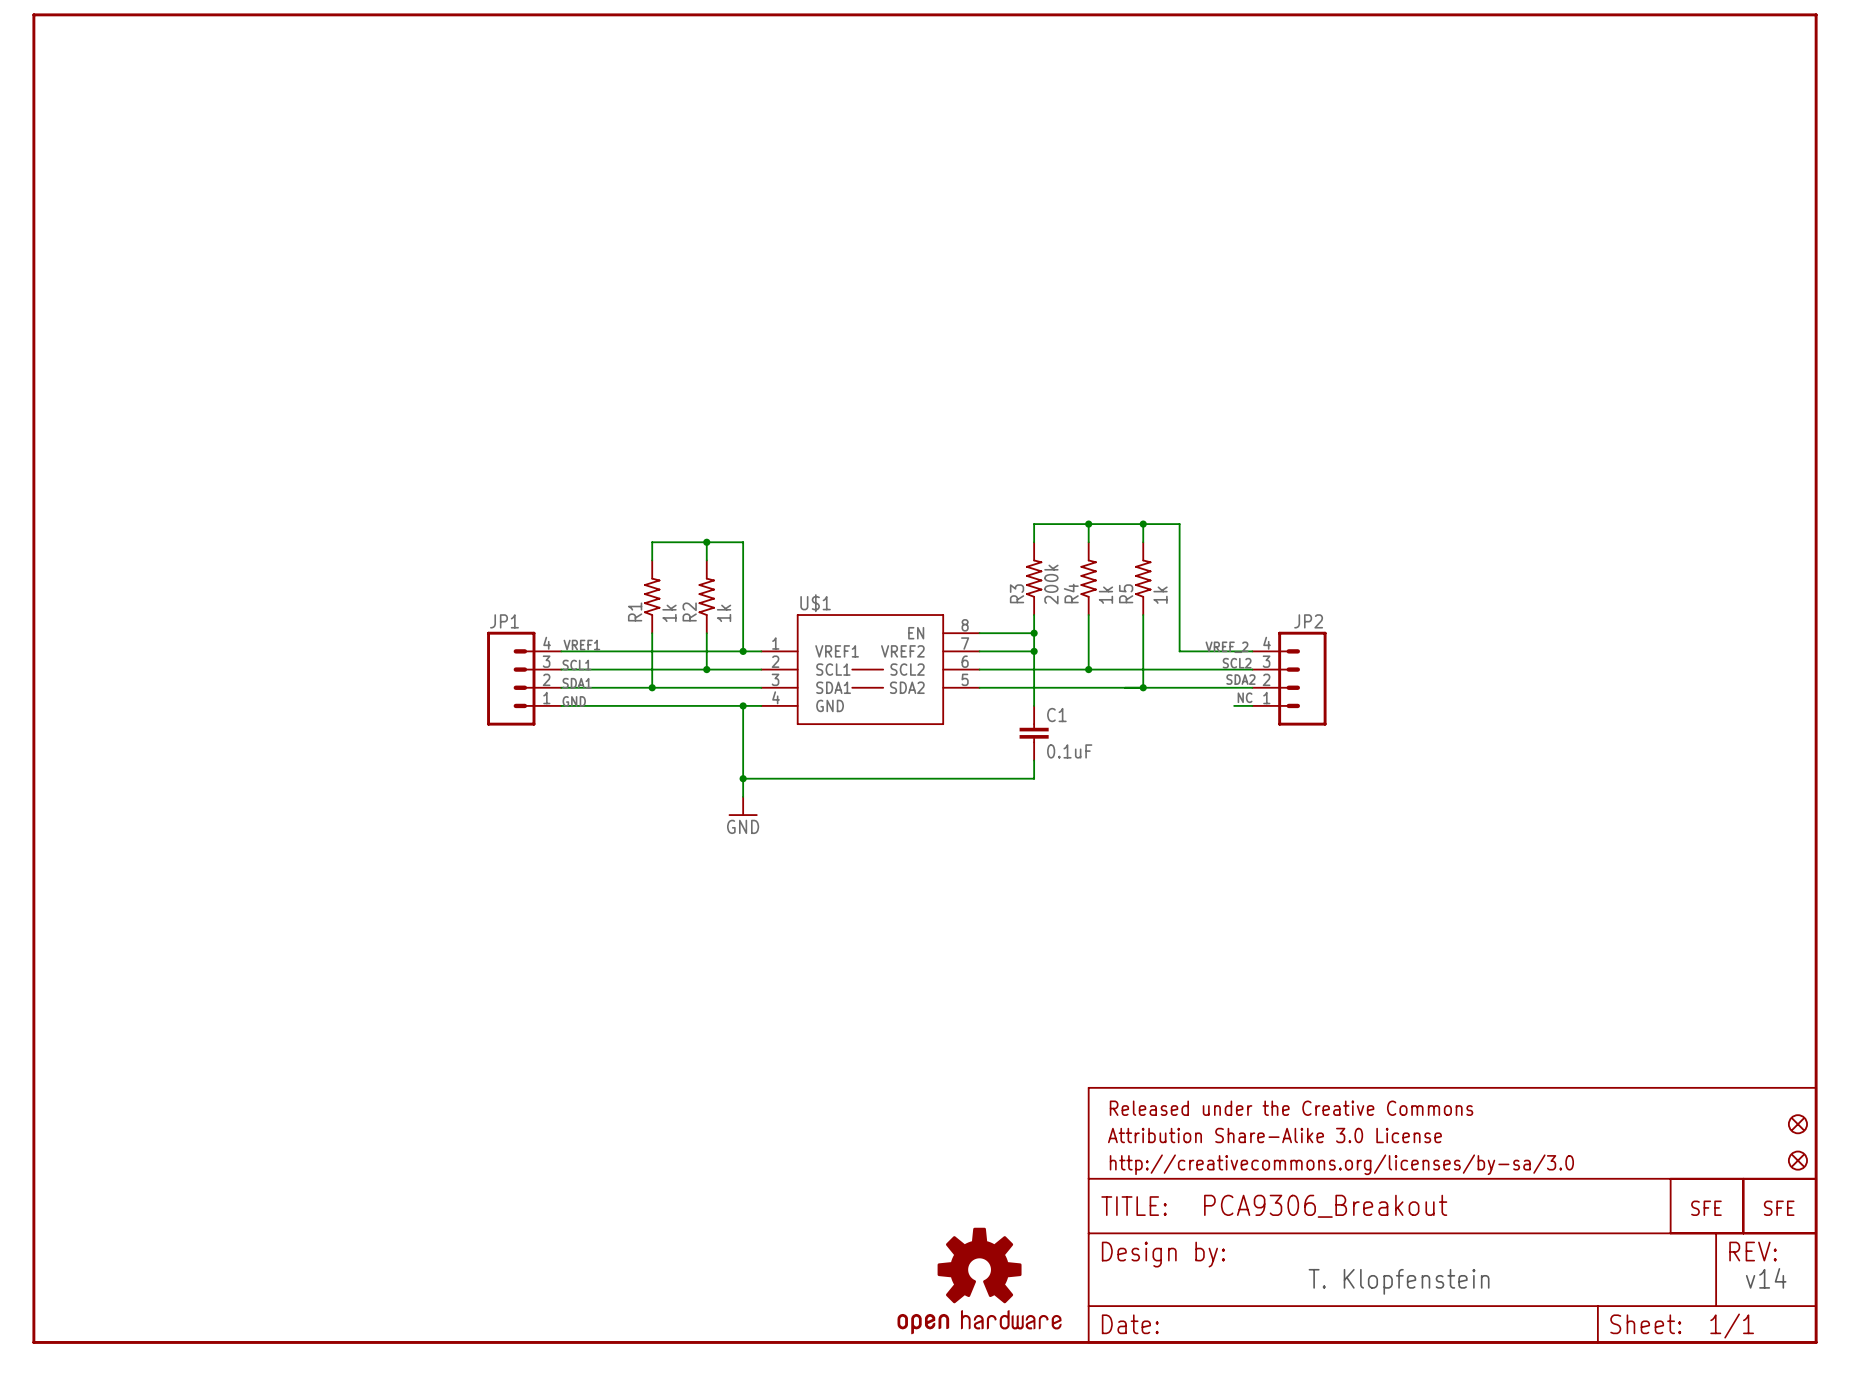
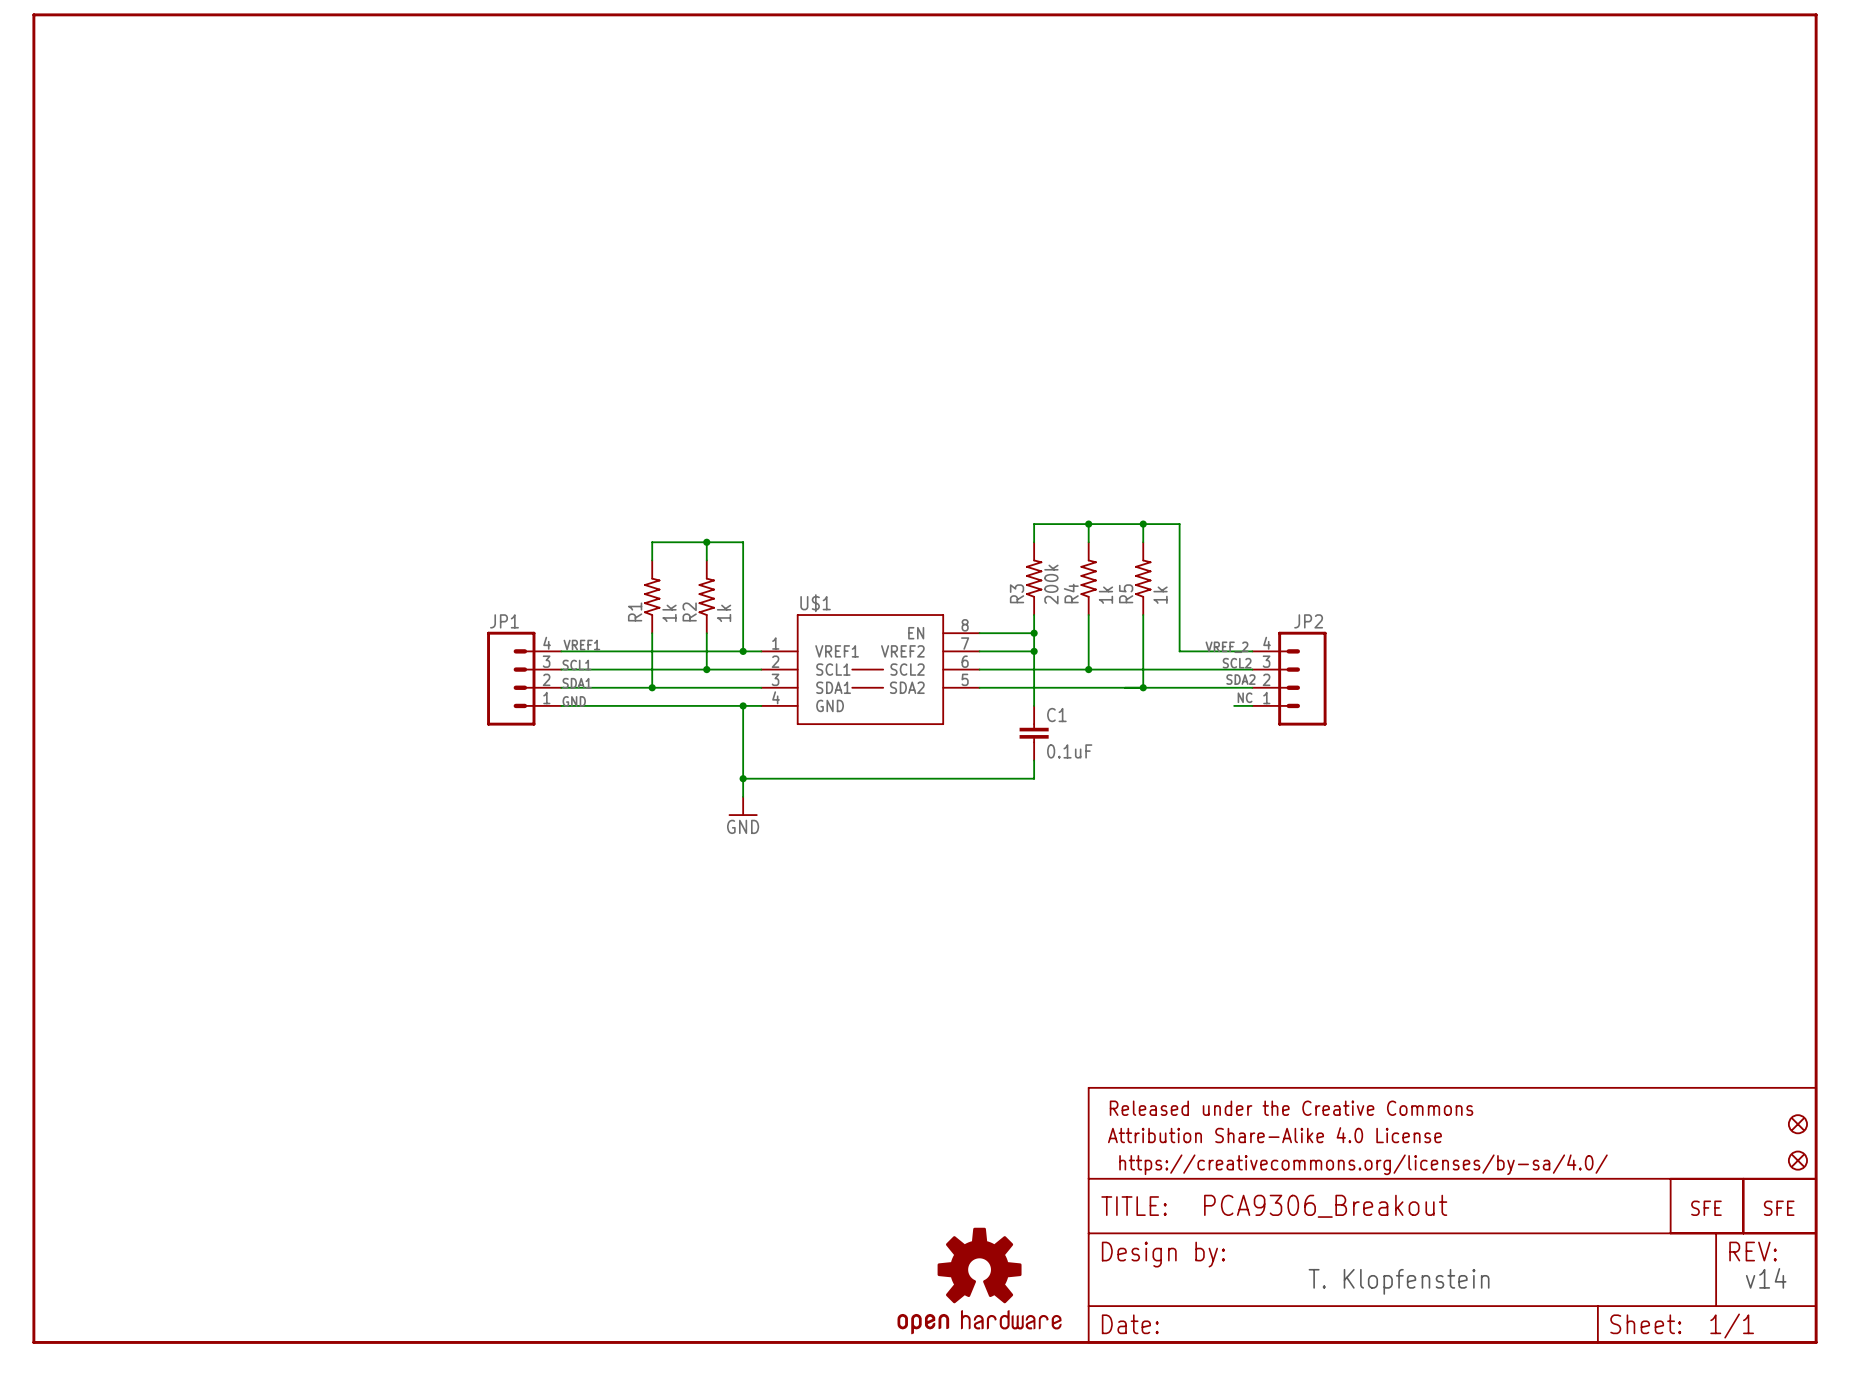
part text: Attribution Share-Alike 3.0 License (1274, 1135) -> Attribution Share-Alike 4.0 License (1274, 1135)
part text: http://creativecommons.org/licenses/by-sa/3.0 (1341, 1164) -> https://creativecommons.org/licenses/by-sa/4.0/ (1363, 1164)

